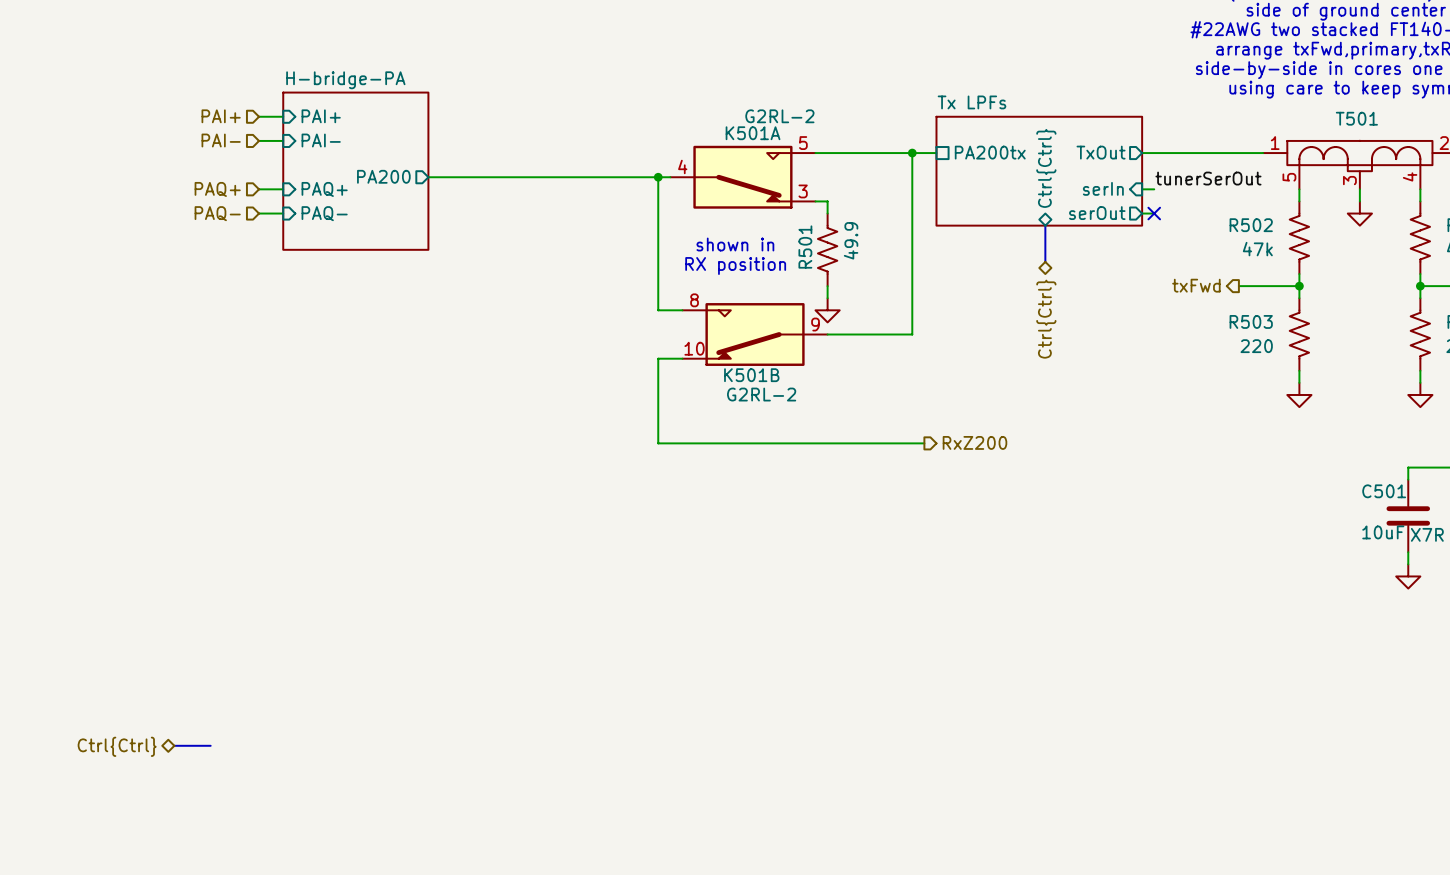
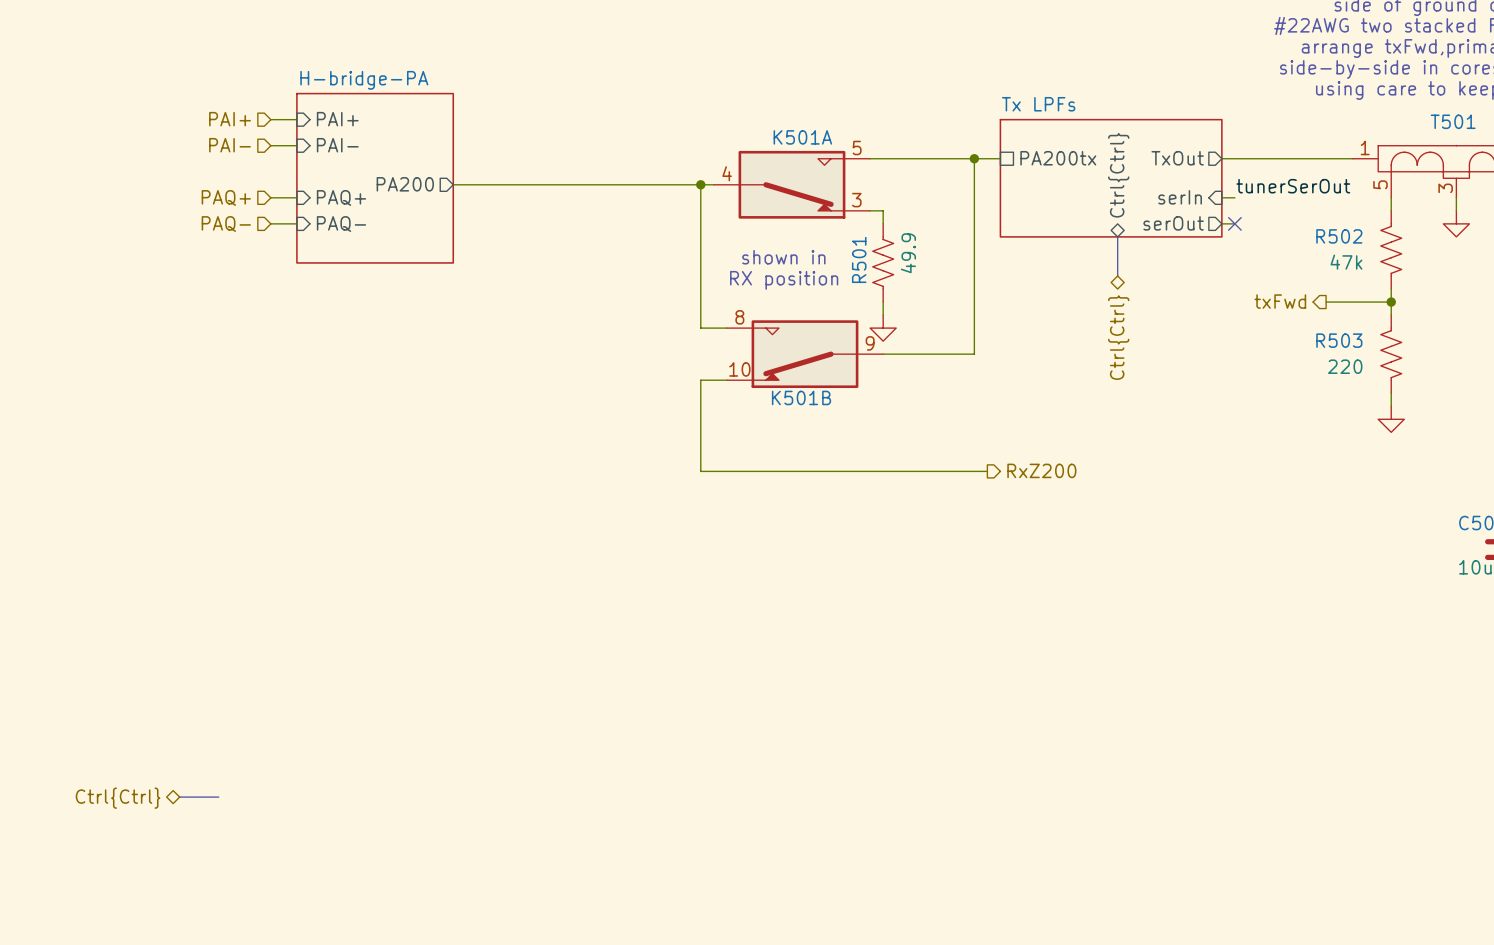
K501A value: G2RL-2 (779, 116) -> none
K501B value: G2RL-2 (761, 394) -> none

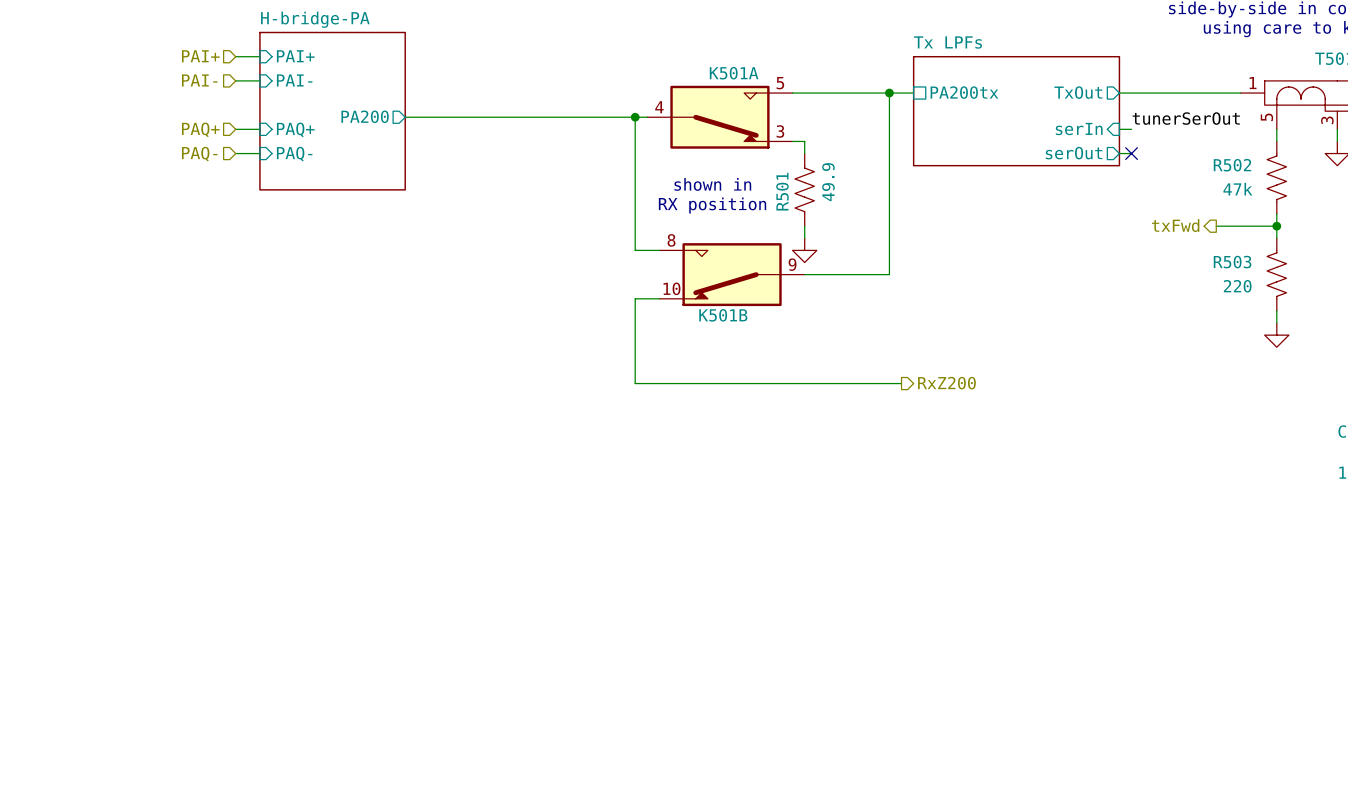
sheet pin: Ctrl{Ctrl} (1118, 175) -> none
bus: (1117, 236) (1117, 275) -> none
hierarchical label: Ctrl{Ctrl} (1118, 337) -> none
bus: (179, 797) (218, 797) -> none
hierarchical label: Ctrl{Ctrl} (118, 798) -> none

